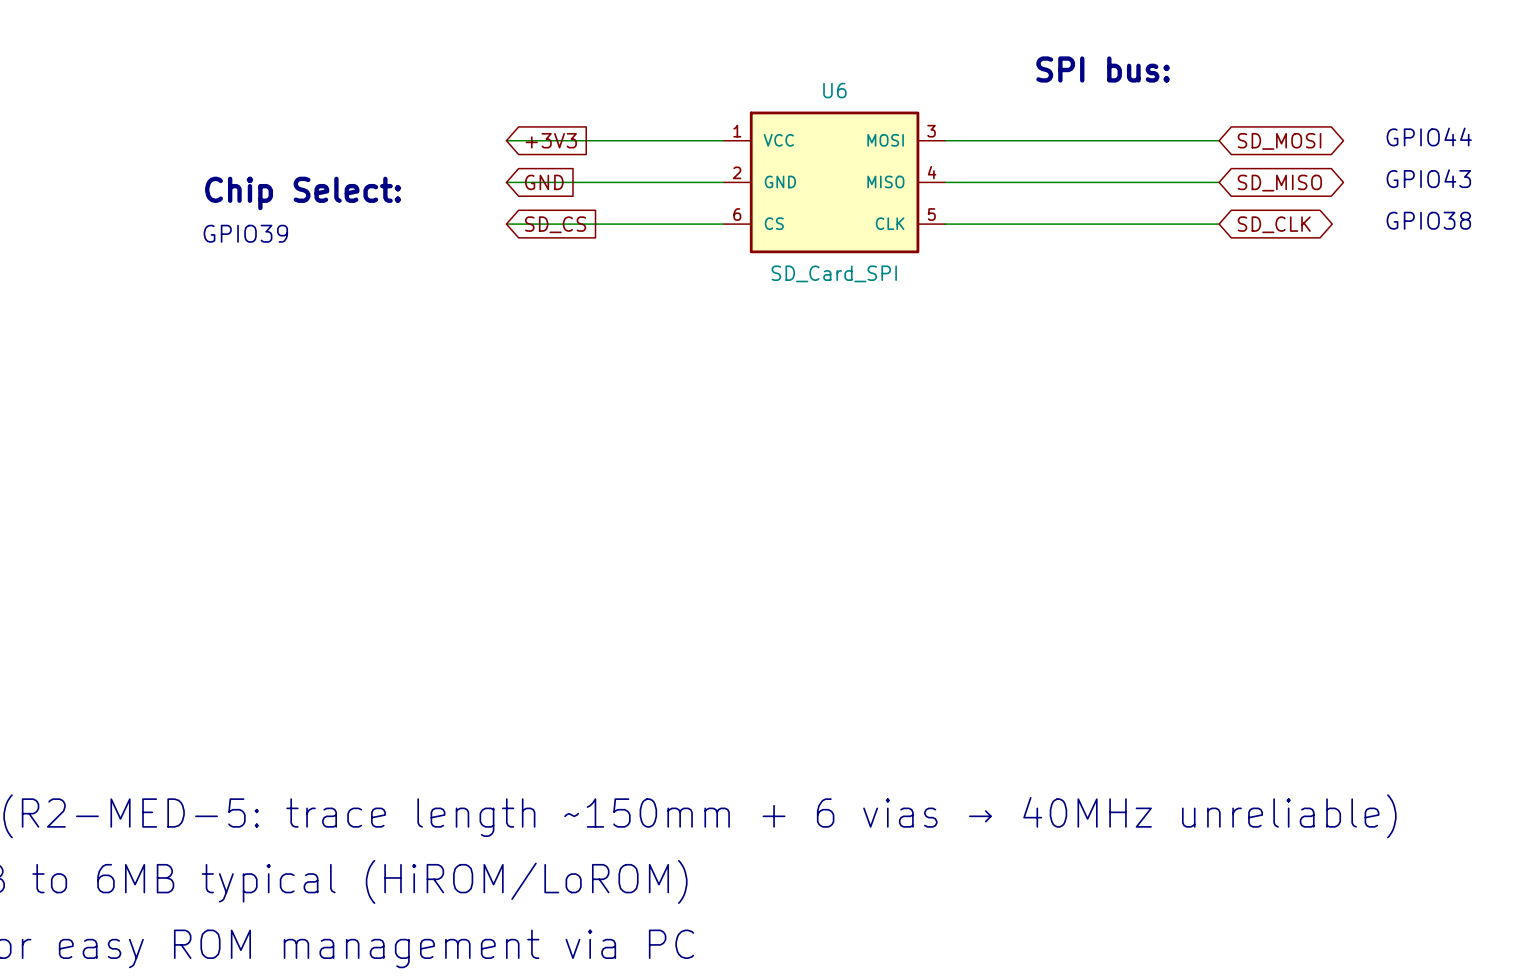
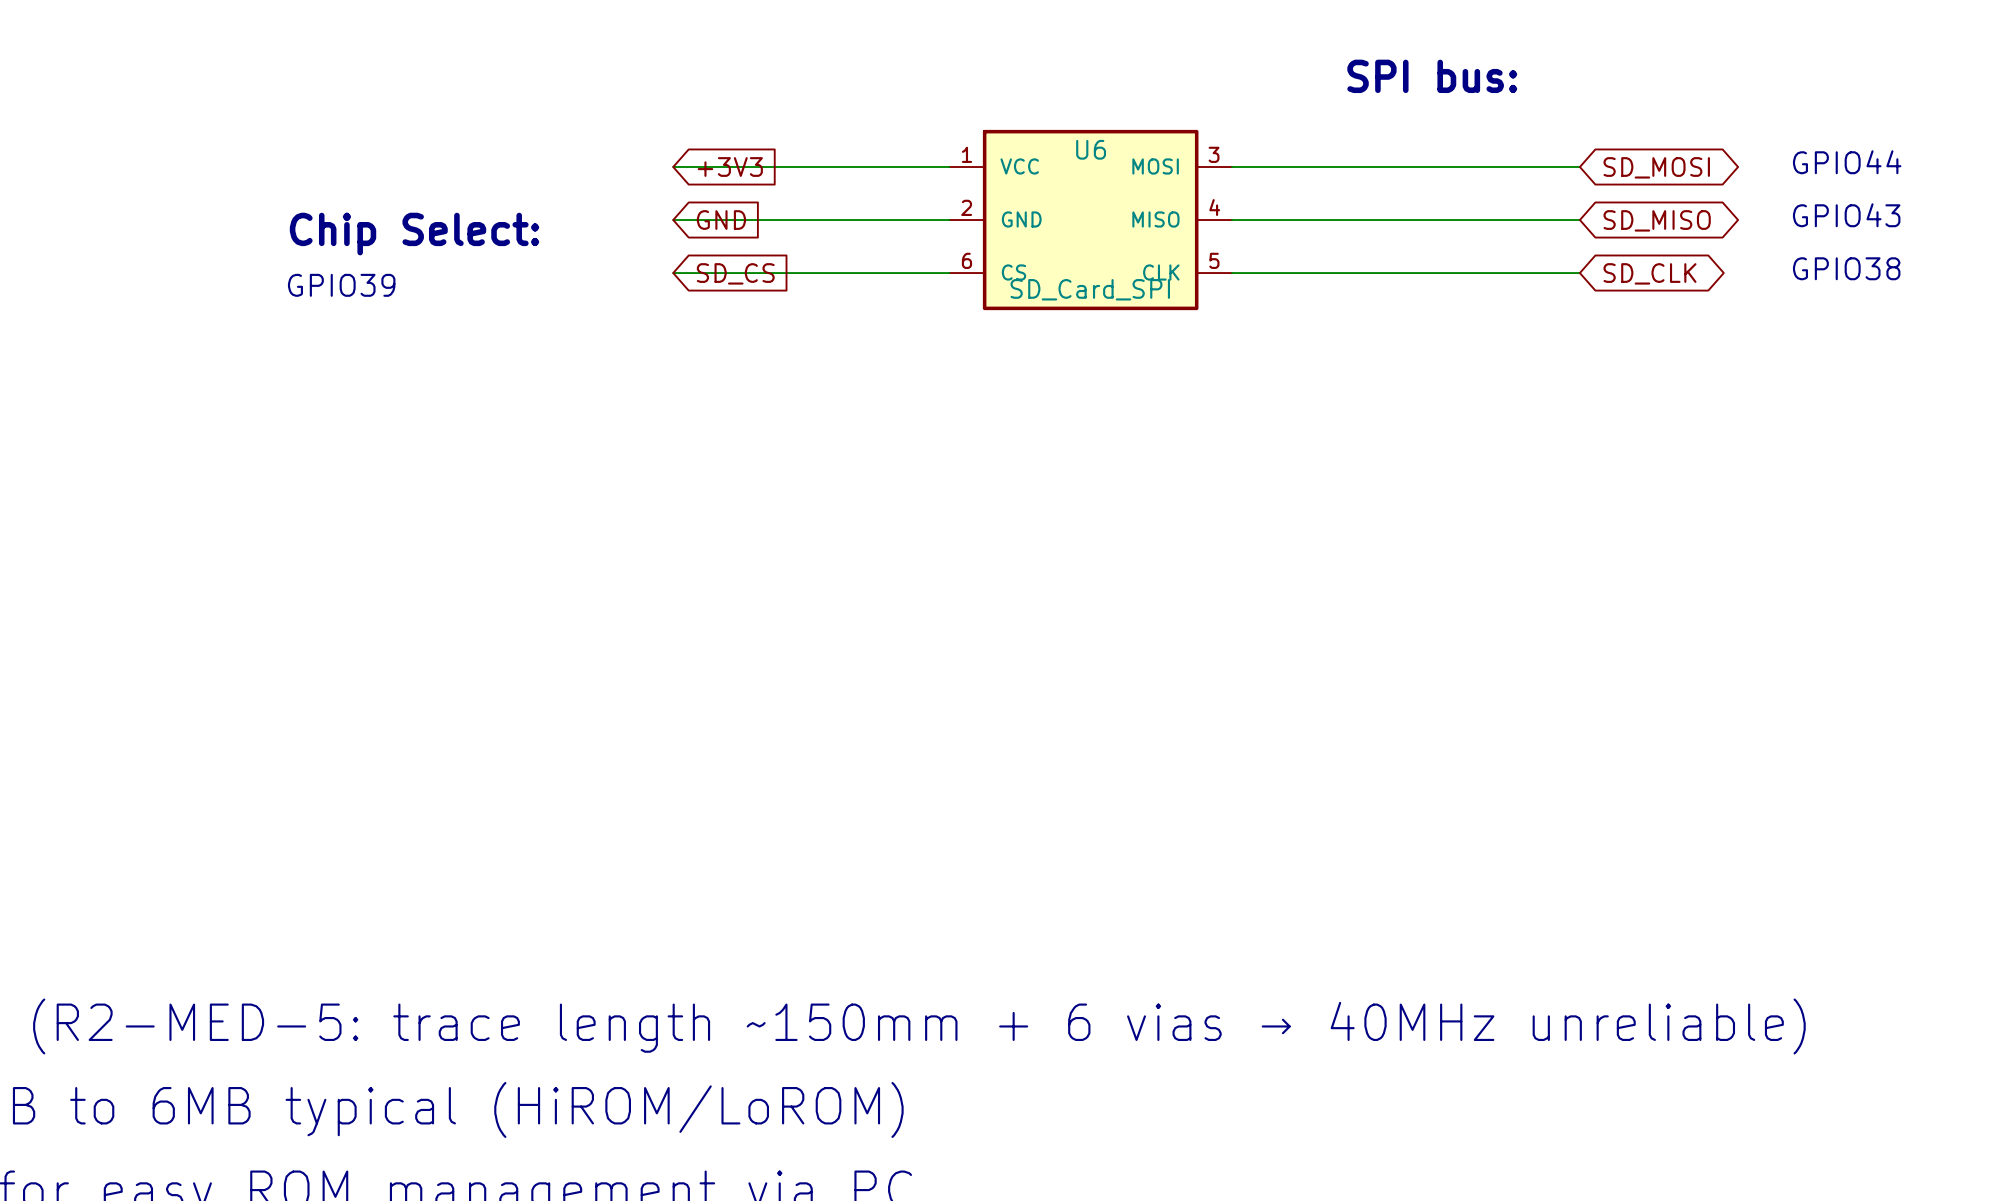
U6 name position: U6 (834, 90) -> U6 (1091, 149)
U6 value position: SD_Card_SPI (834, 273) -> SD_Card_SPI (1090, 289)

